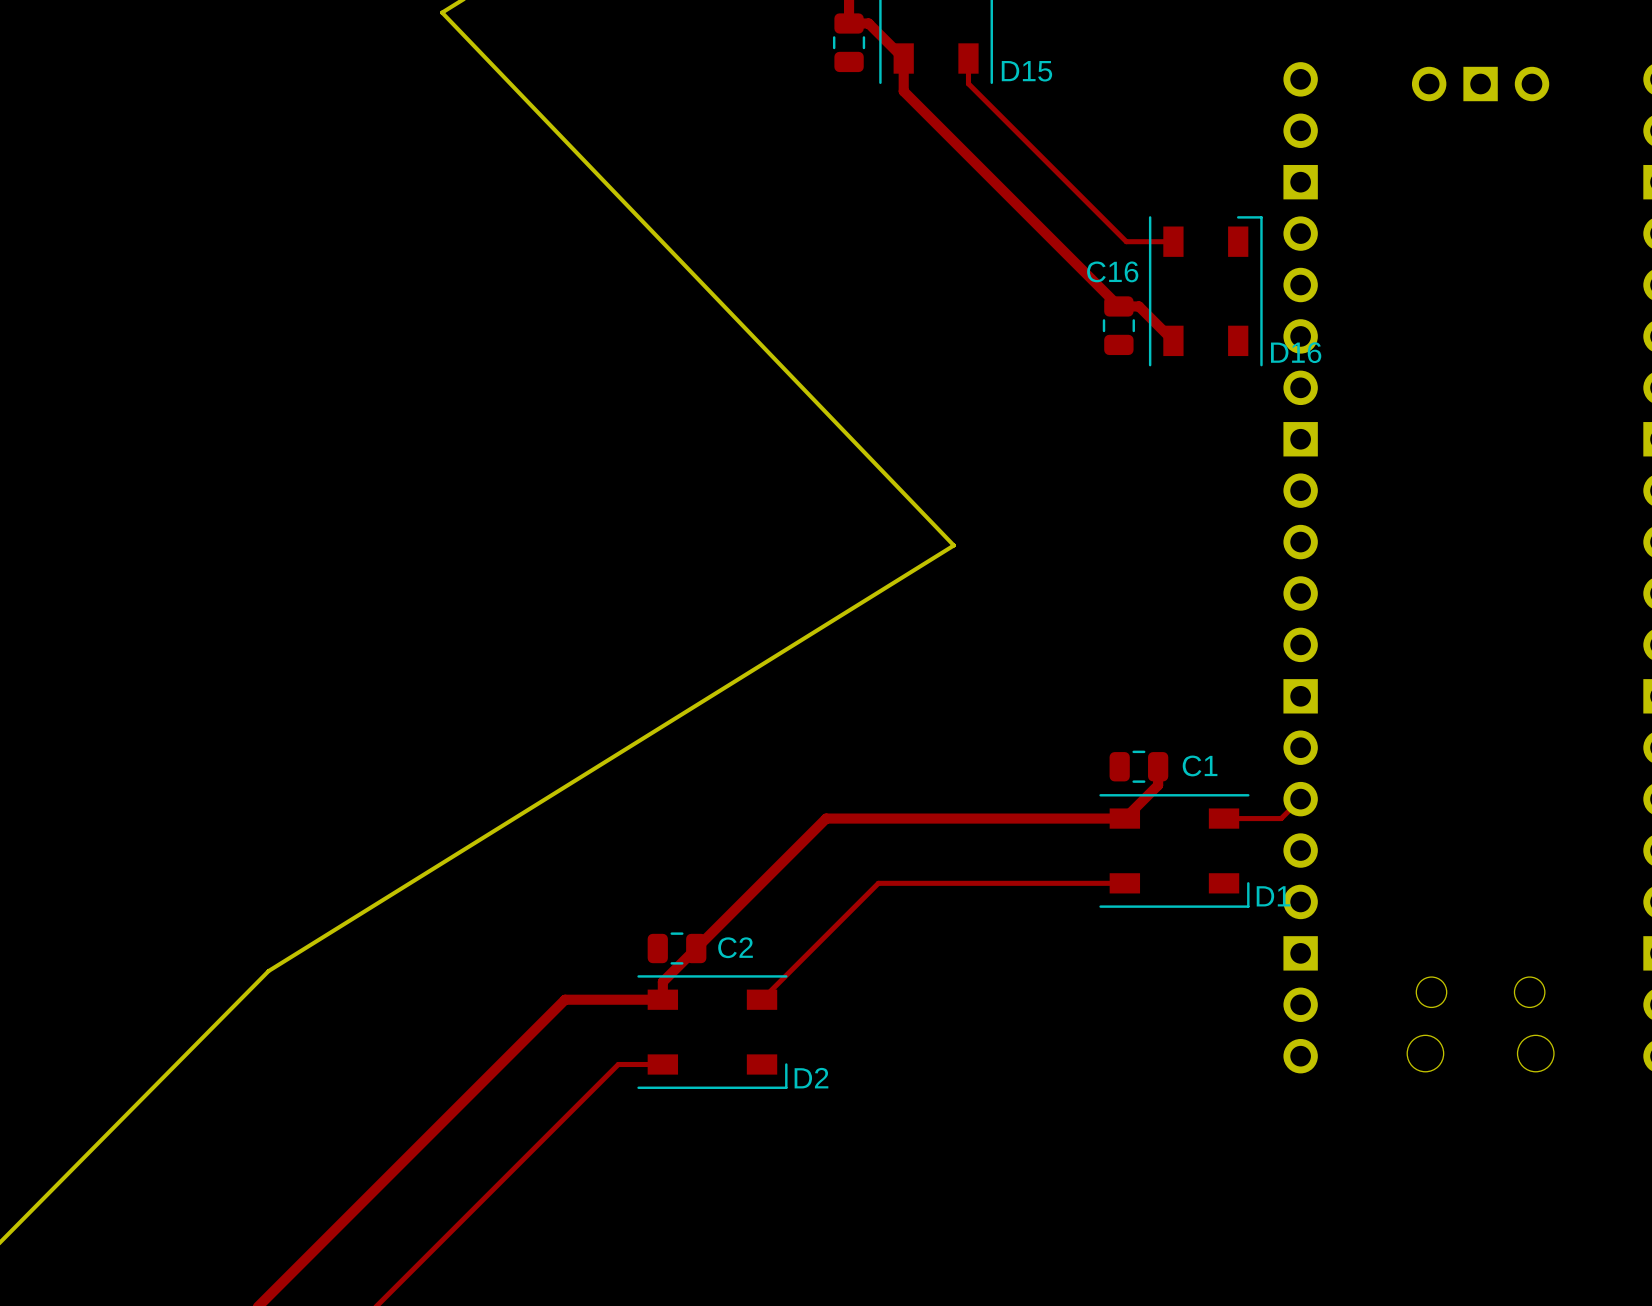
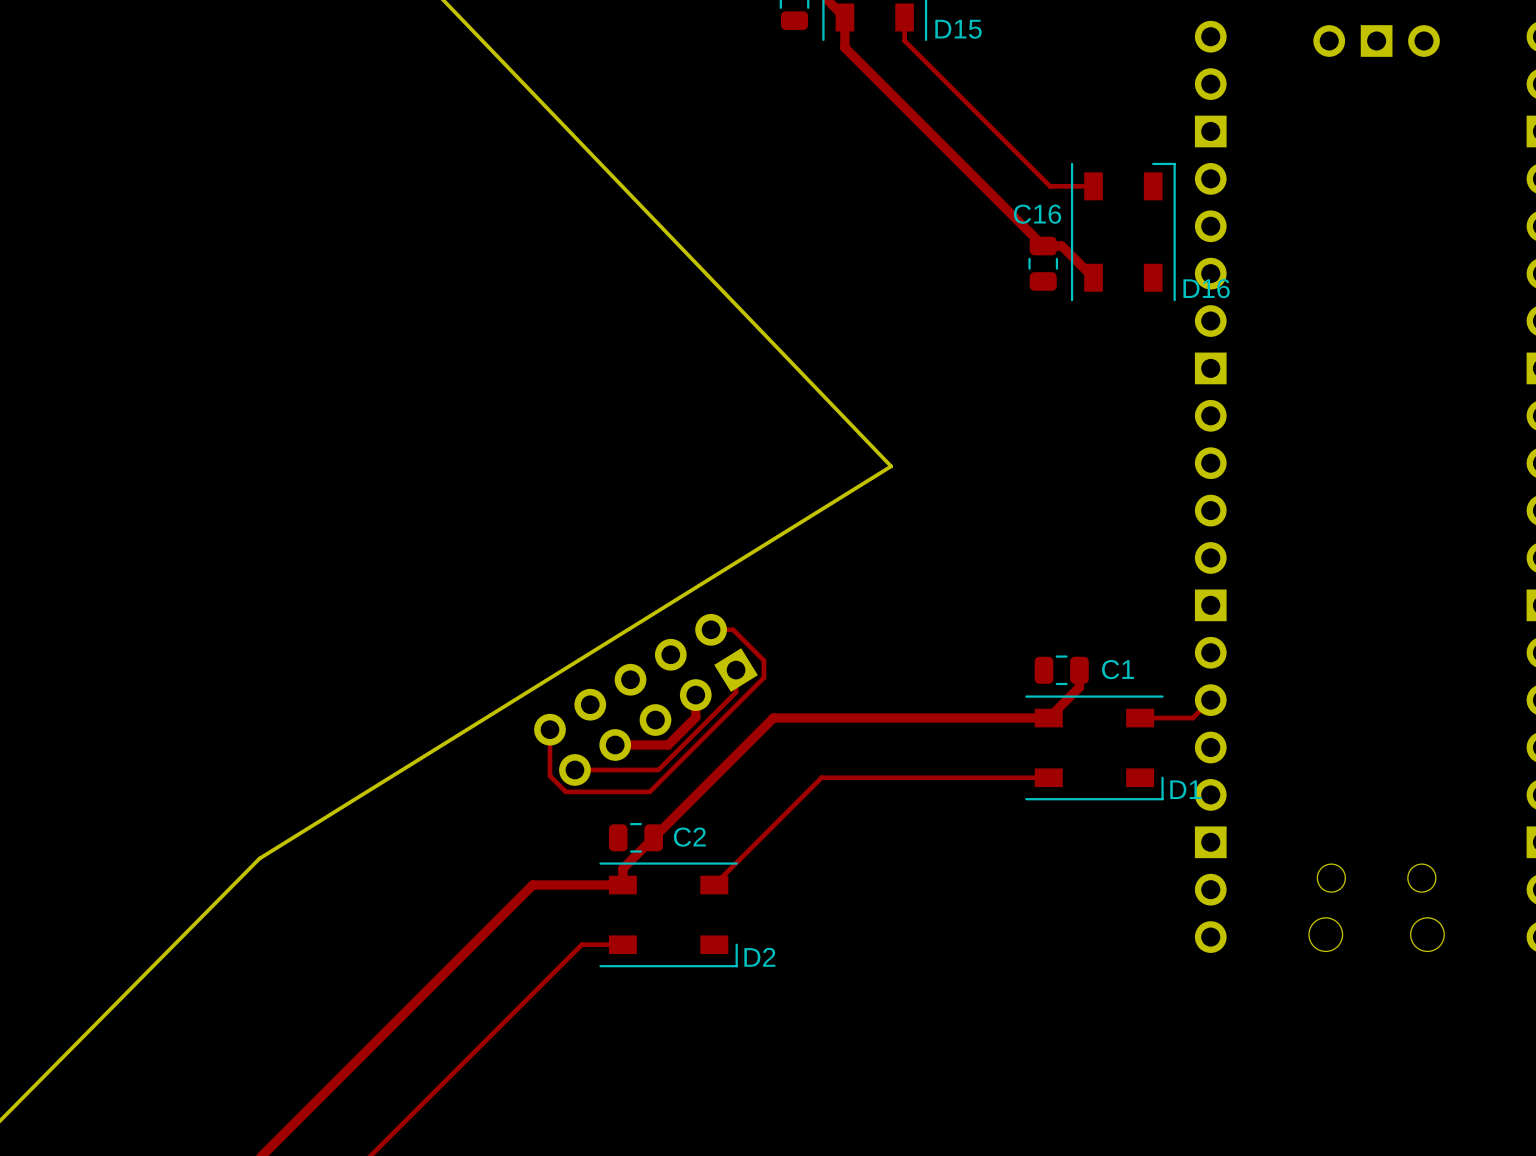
track: none -> (711, 629) (733, 629) (763, 660) (763, 677) (649, 791) (565, 791) (549, 775) (549, 729)
track: none -> (736, 670) (736, 692) (658, 769) (574, 769)
track: none -> (695, 695) (695, 717) (668, 744) (615, 744)
part: none -> (646, 699)

